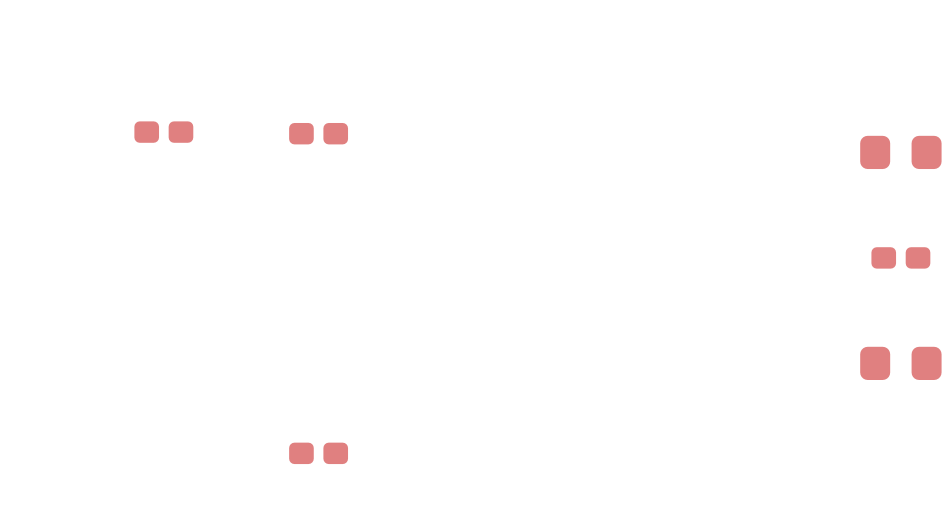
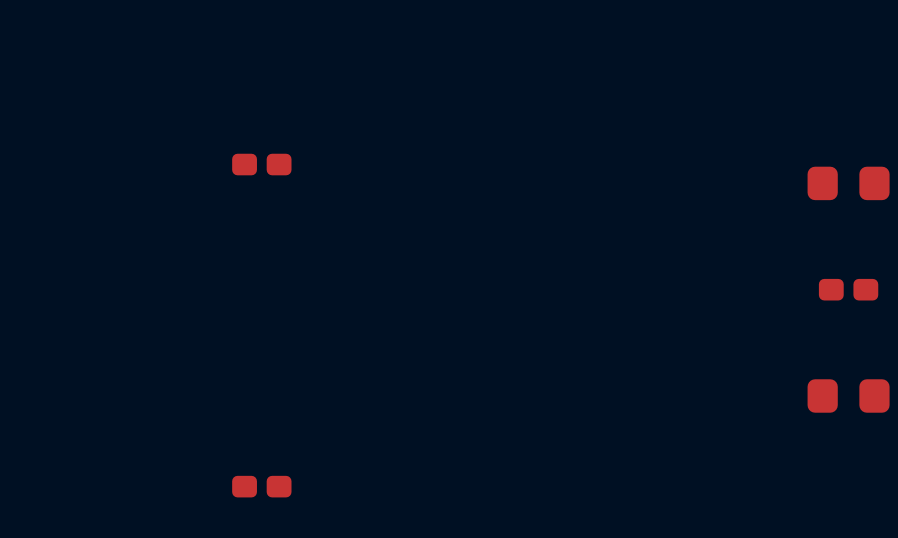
part: (163, 132) -> none

